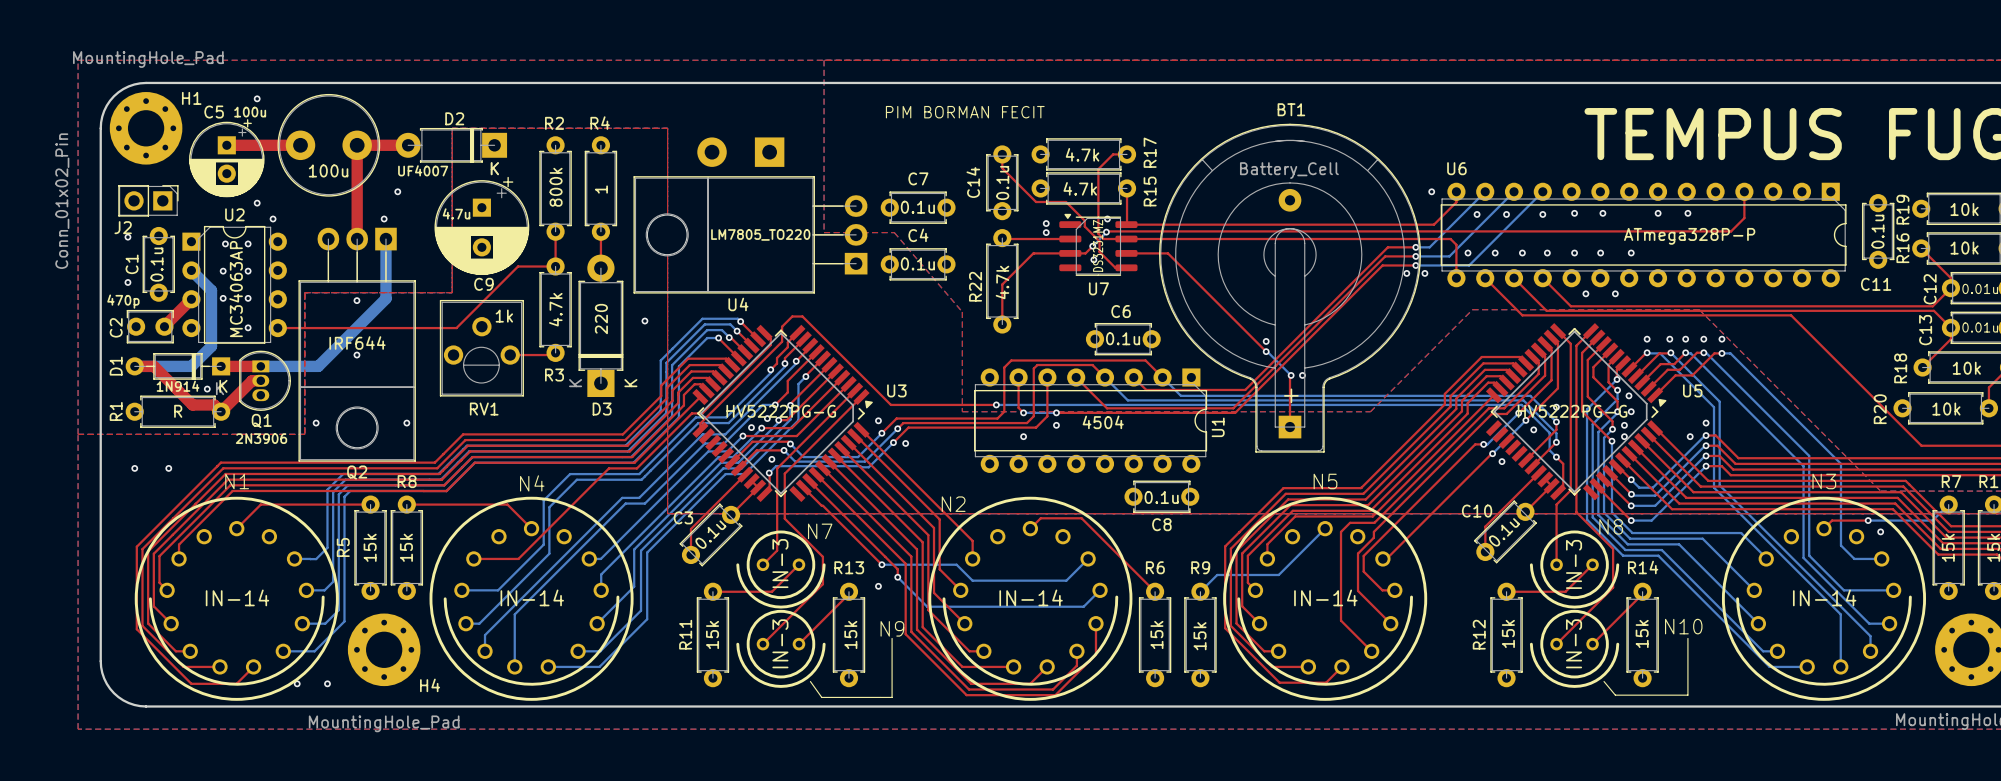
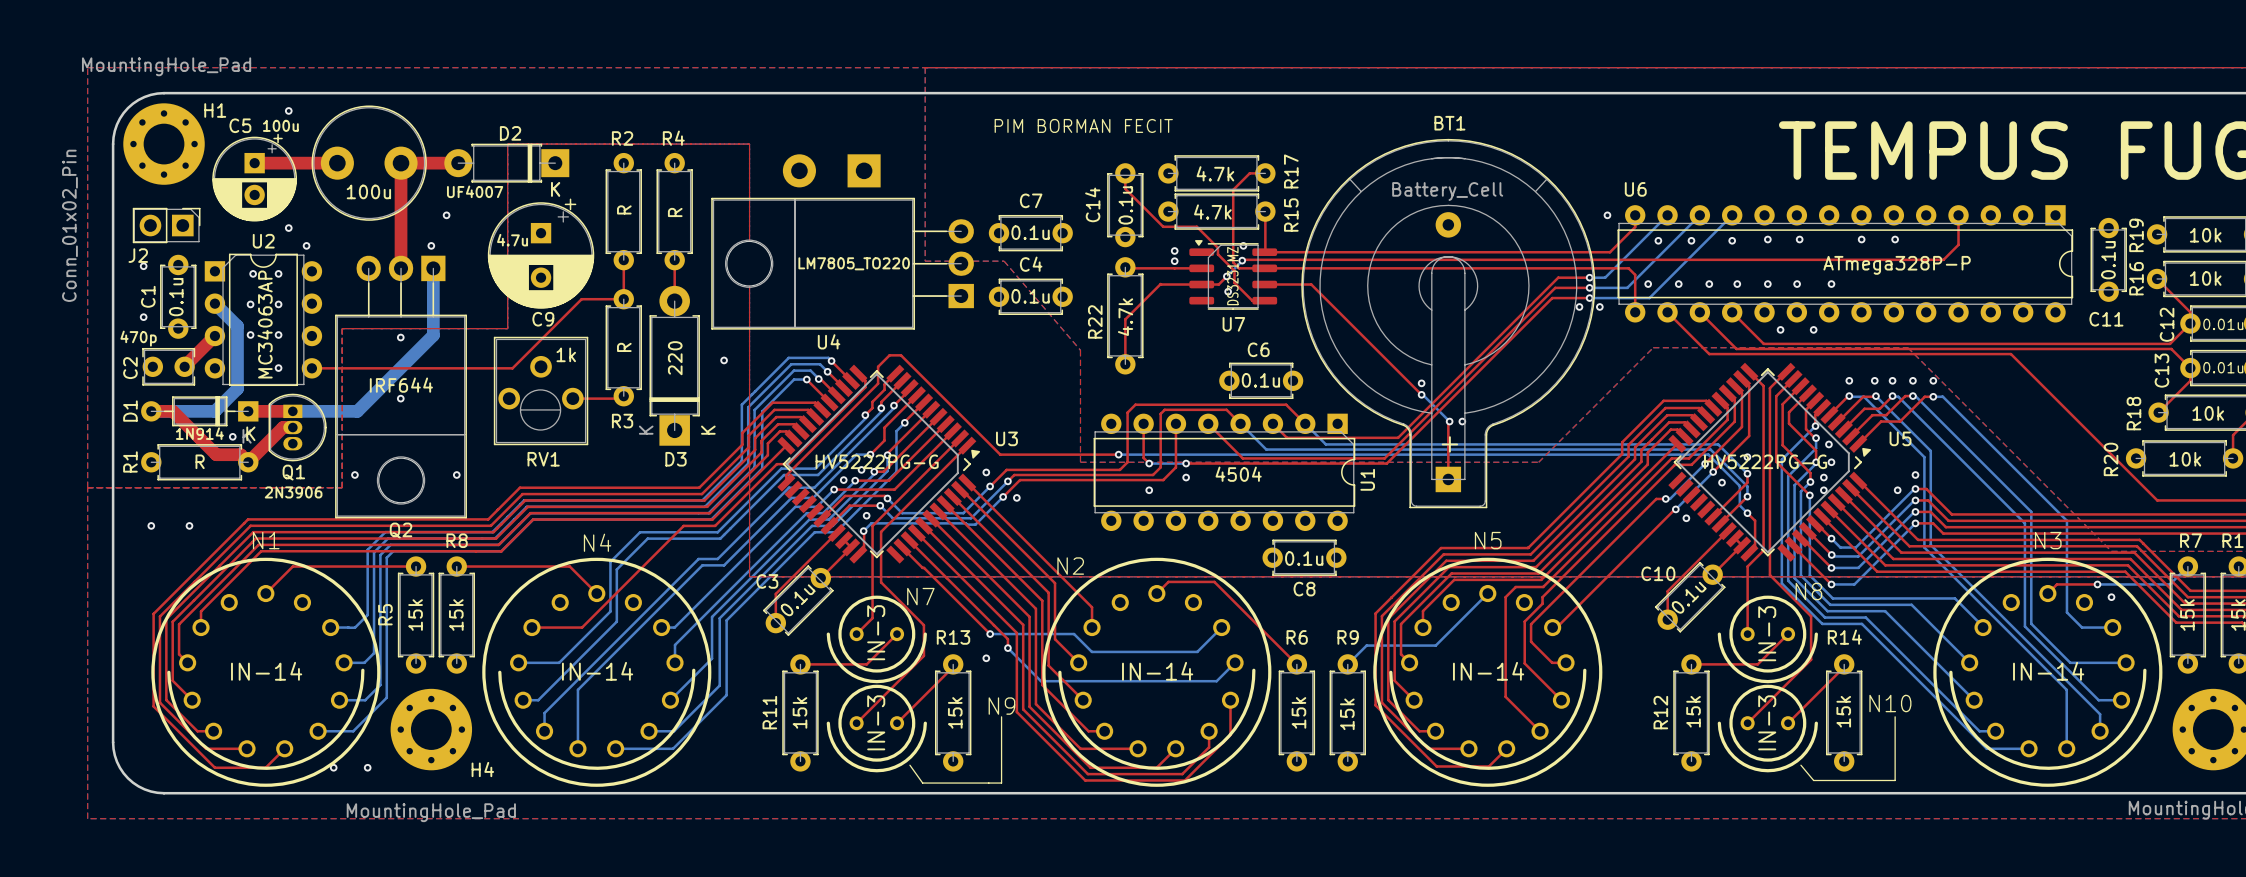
R2 value: 800k (556, 187) -> R (624, 209)
R4 value: 1 (601, 189) -> R (675, 212)
R3 value: 4.7k (555, 309) -> R (624, 347)

